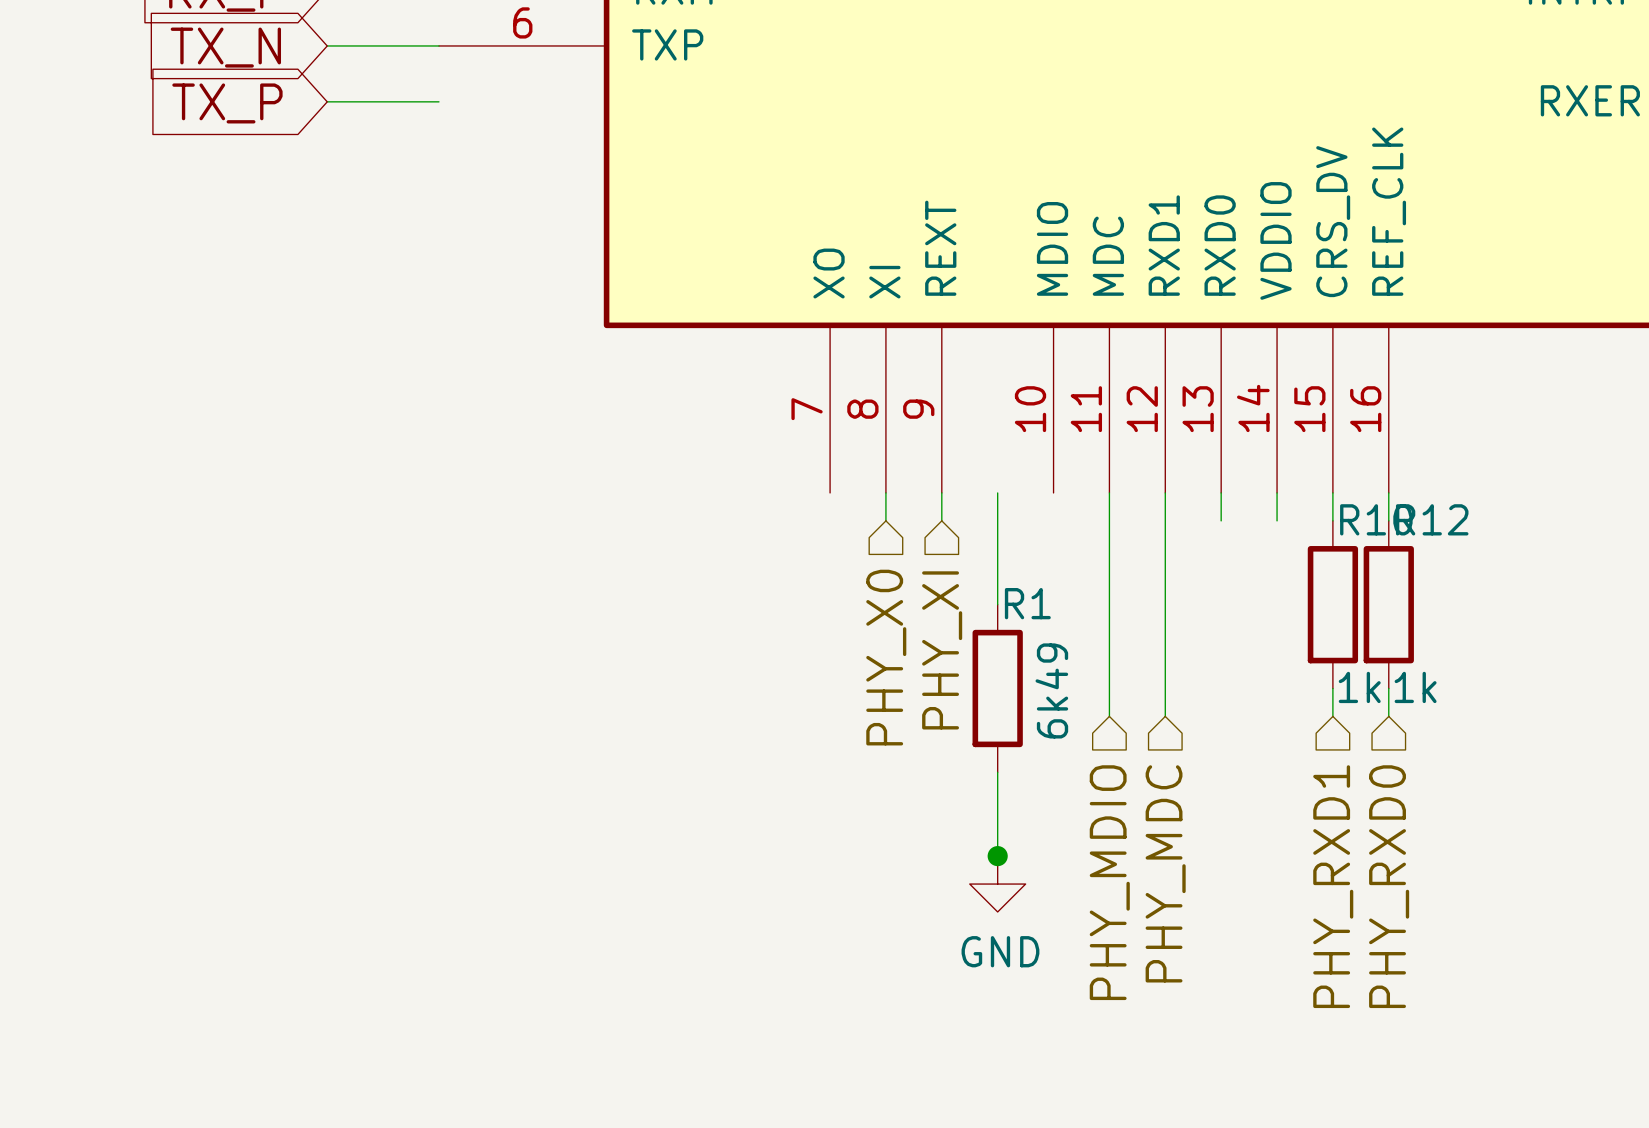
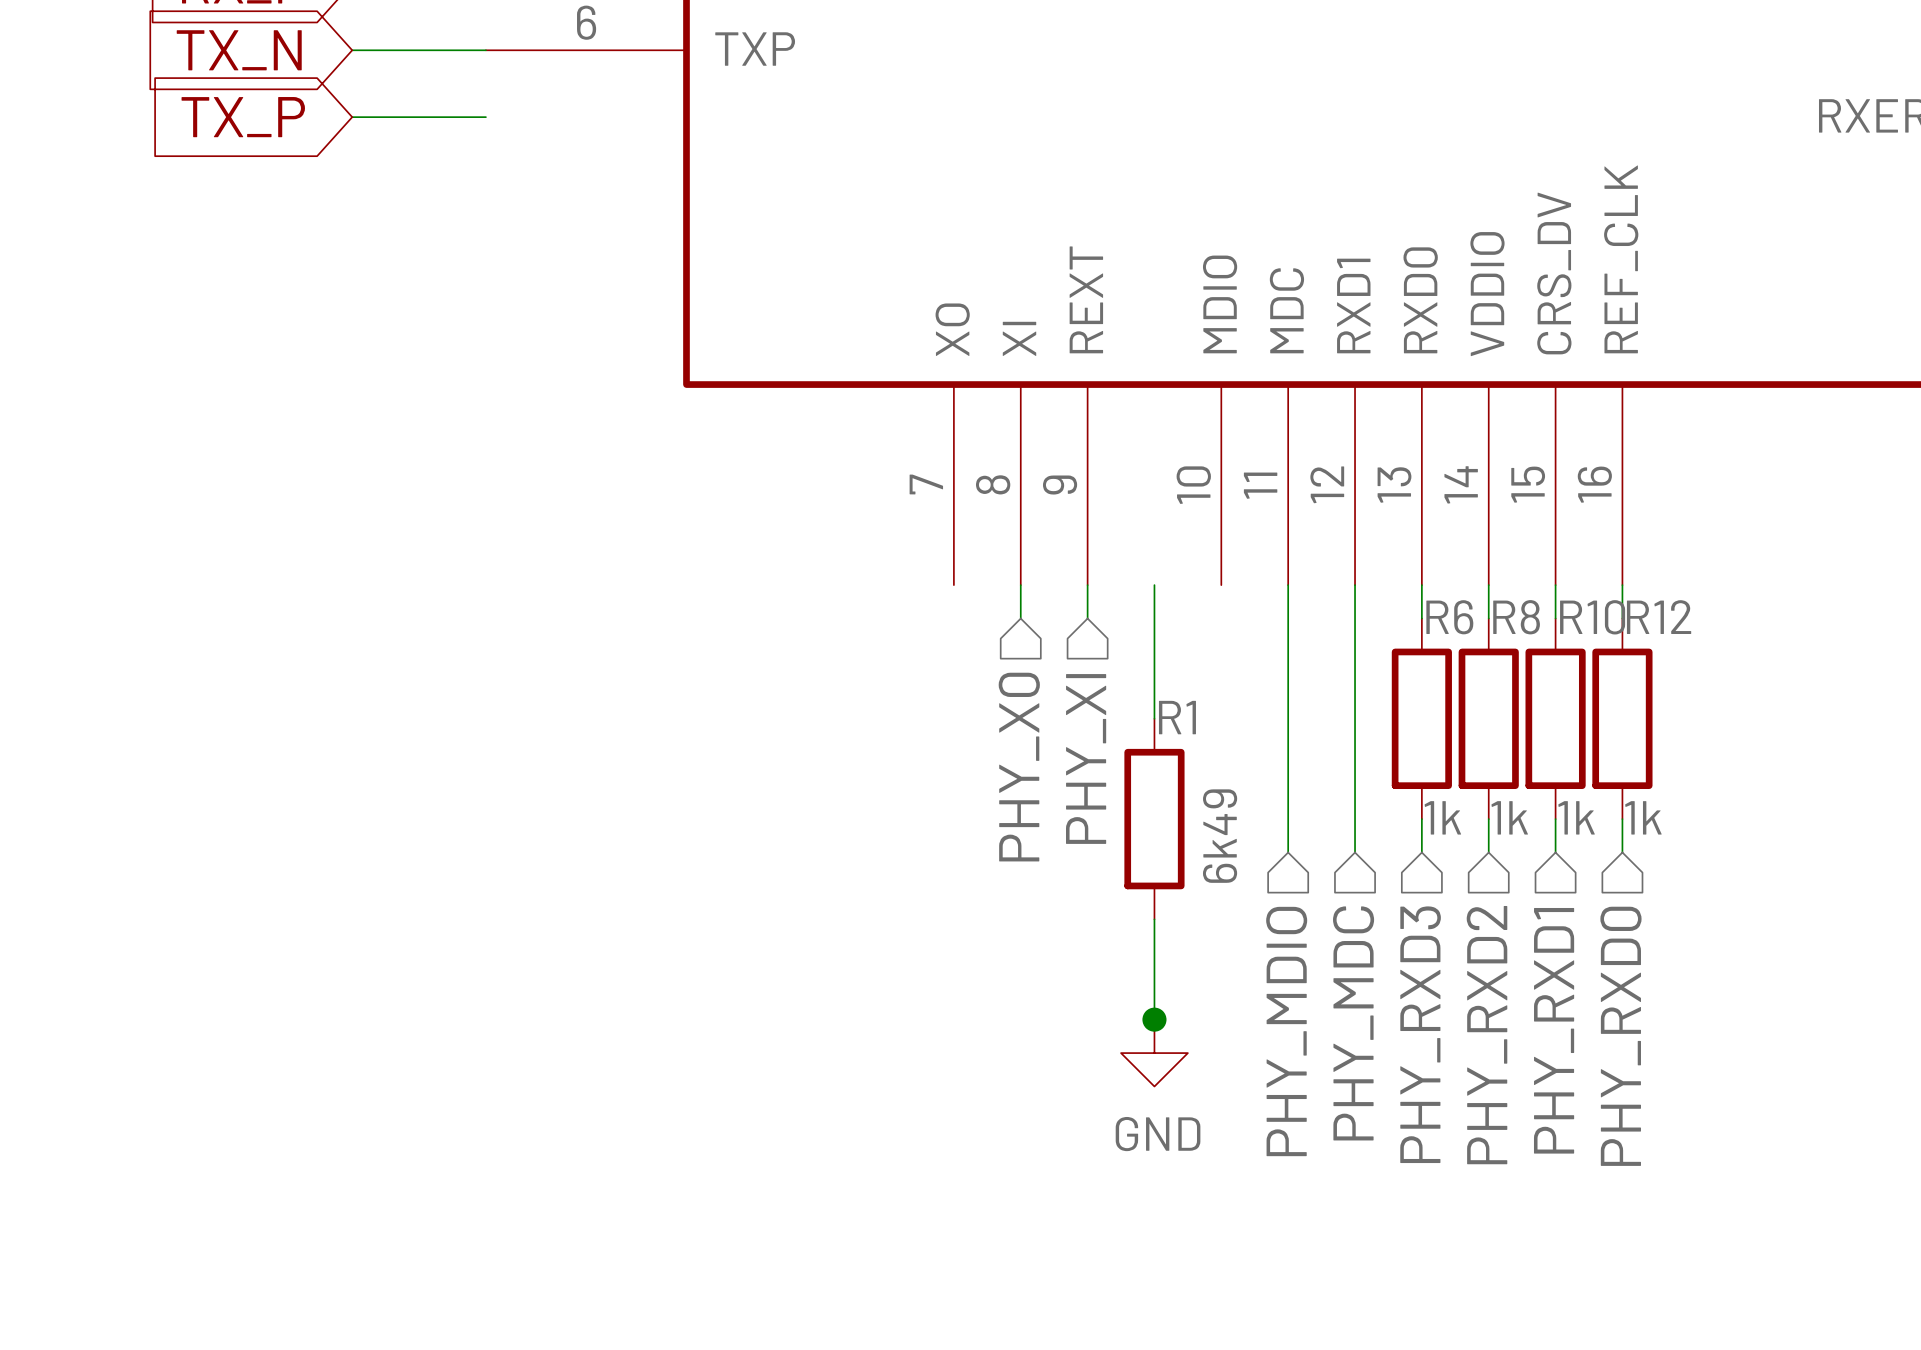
R6: none -> 1k (1421, 718)
R8: none -> 1k (1488, 718)
wire: none -> (1421, 819) (1421, 852)
wire: none -> (1488, 819) (1488, 852)
hierarchical label: none -> PHY_RXD3 (1420, 1034)
hierarchical label: none -> PHY_RXD2 (1487, 1035)

